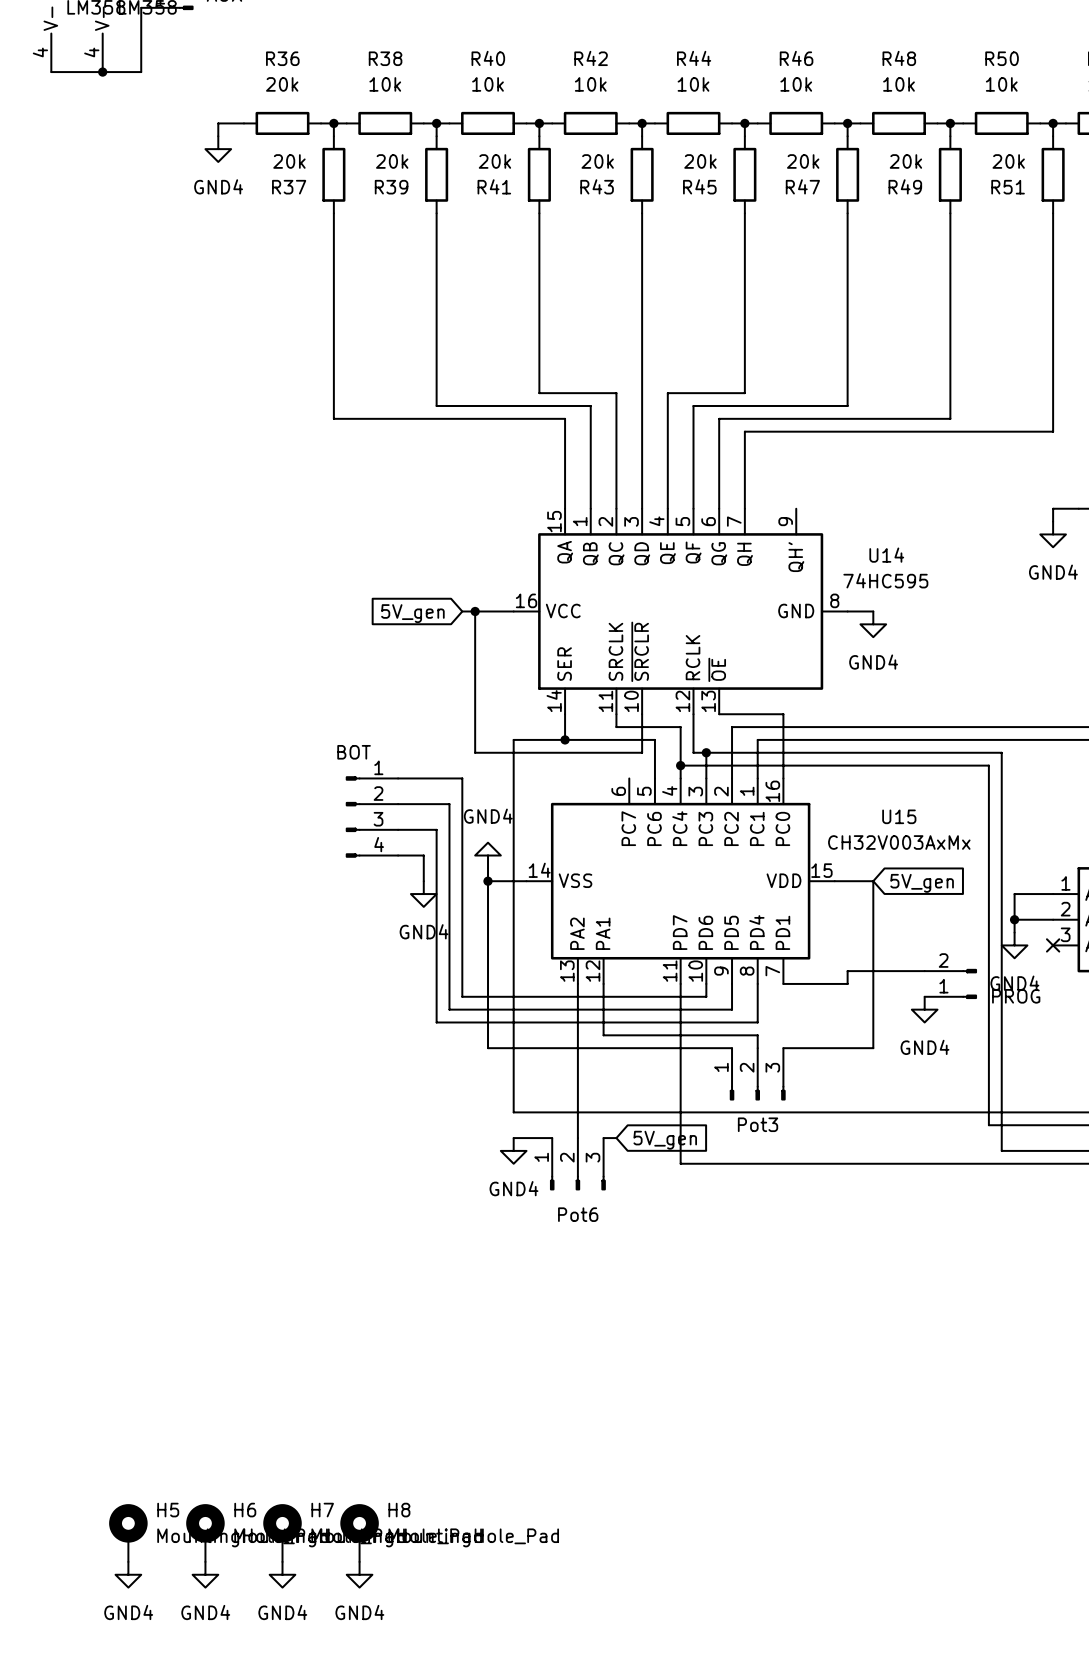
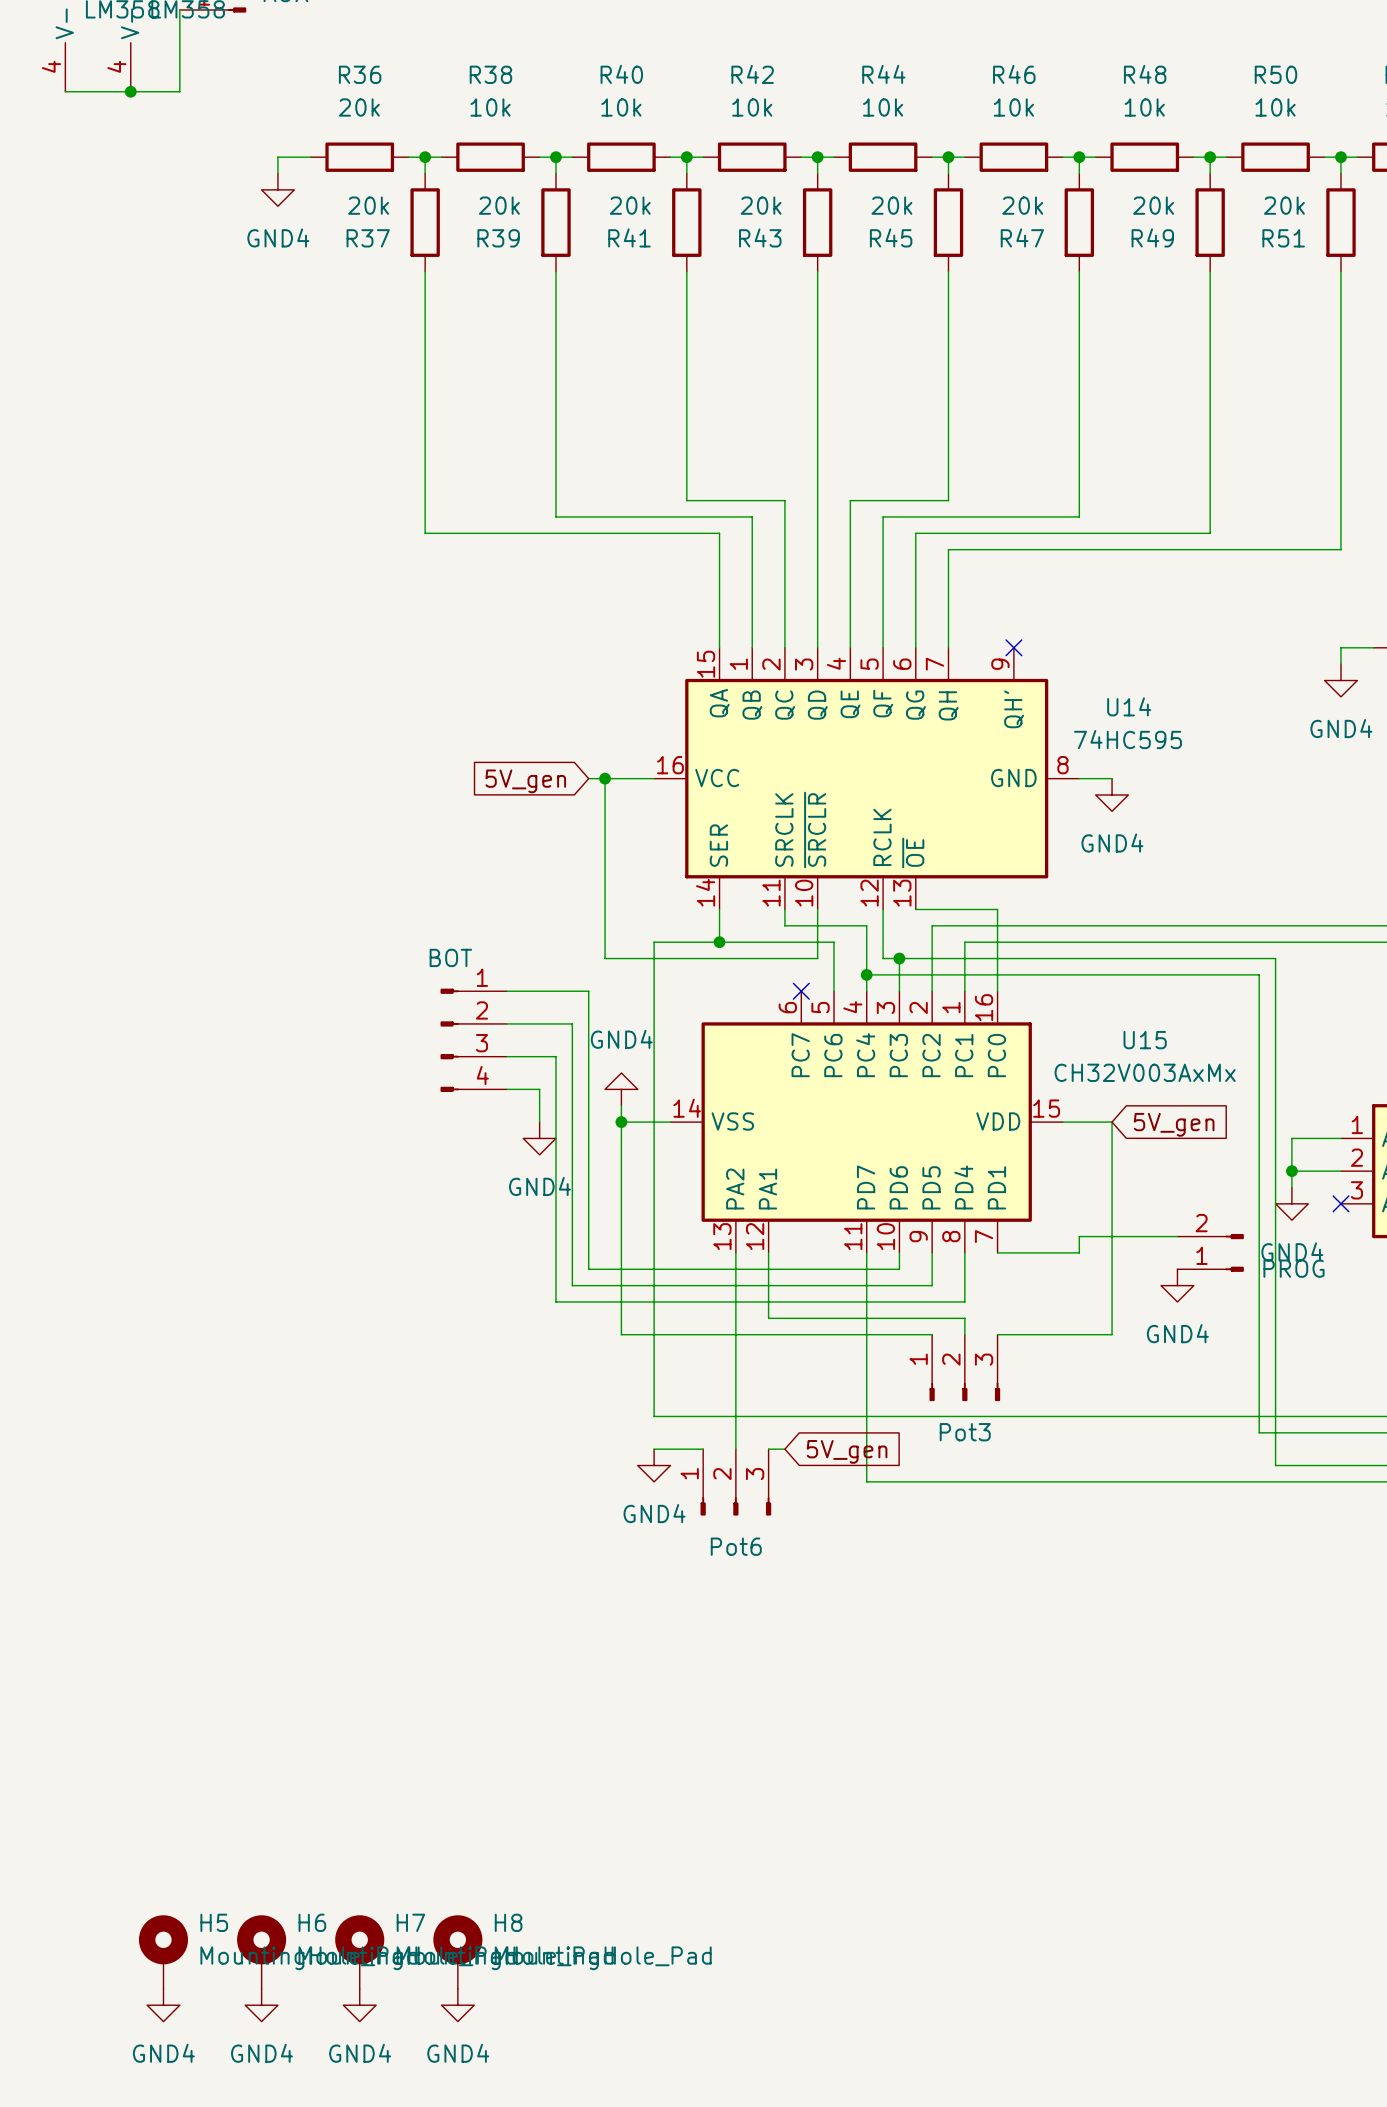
no-connect mark: none -> (1013, 647)
no-connect mark: none -> (801, 991)

